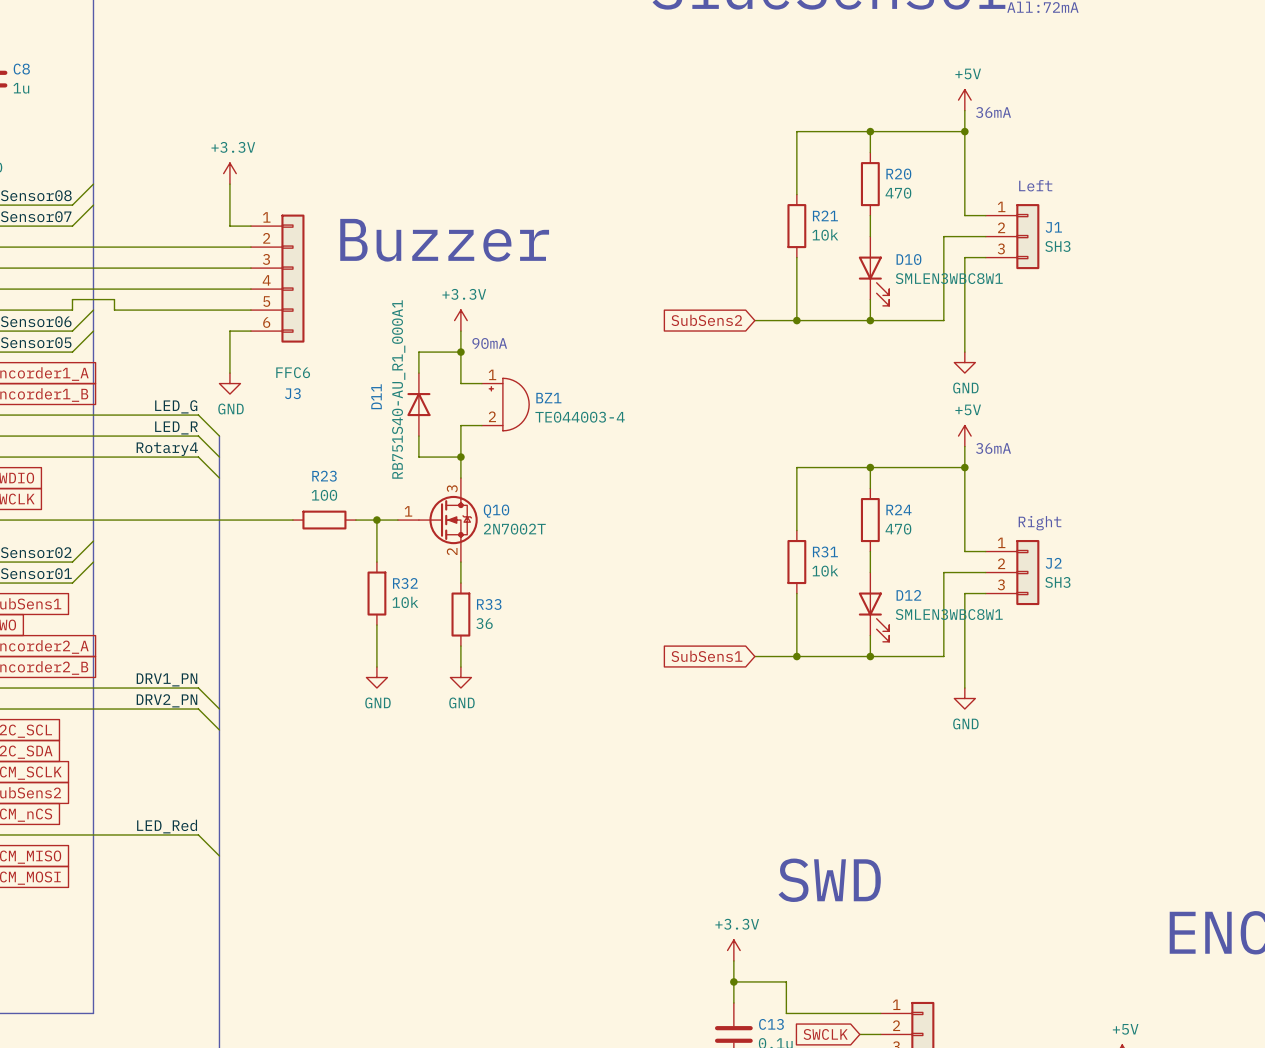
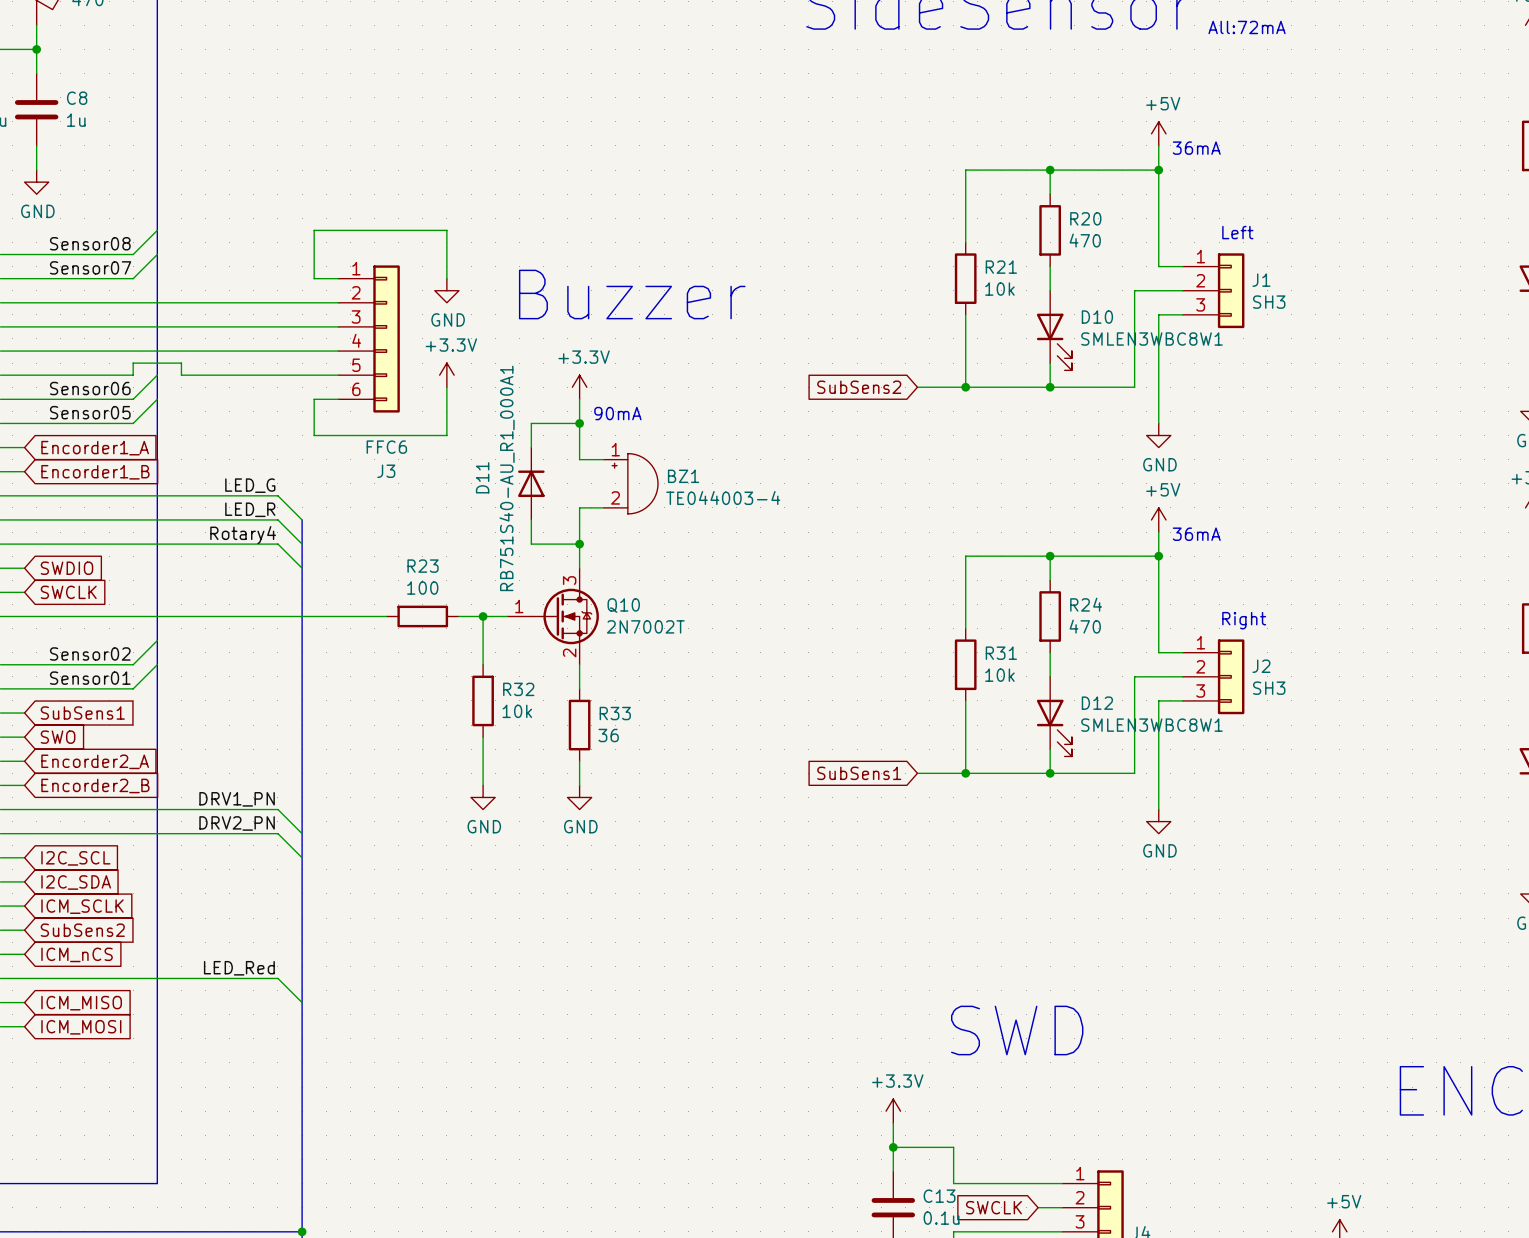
power symbol position: +3.3V (229, 173) -> +3.3V (446, 375)
wire: none -> (314, 230) (446, 230) (446, 278)
text position: Buzzer (444, 240) -> Buzzer (632, 294)
wire: (229, 362) (229, 373) -> (314, 435) (446, 435) (446, 387)
power symbol position: GND (229, 383) -> GND (446, 290)

